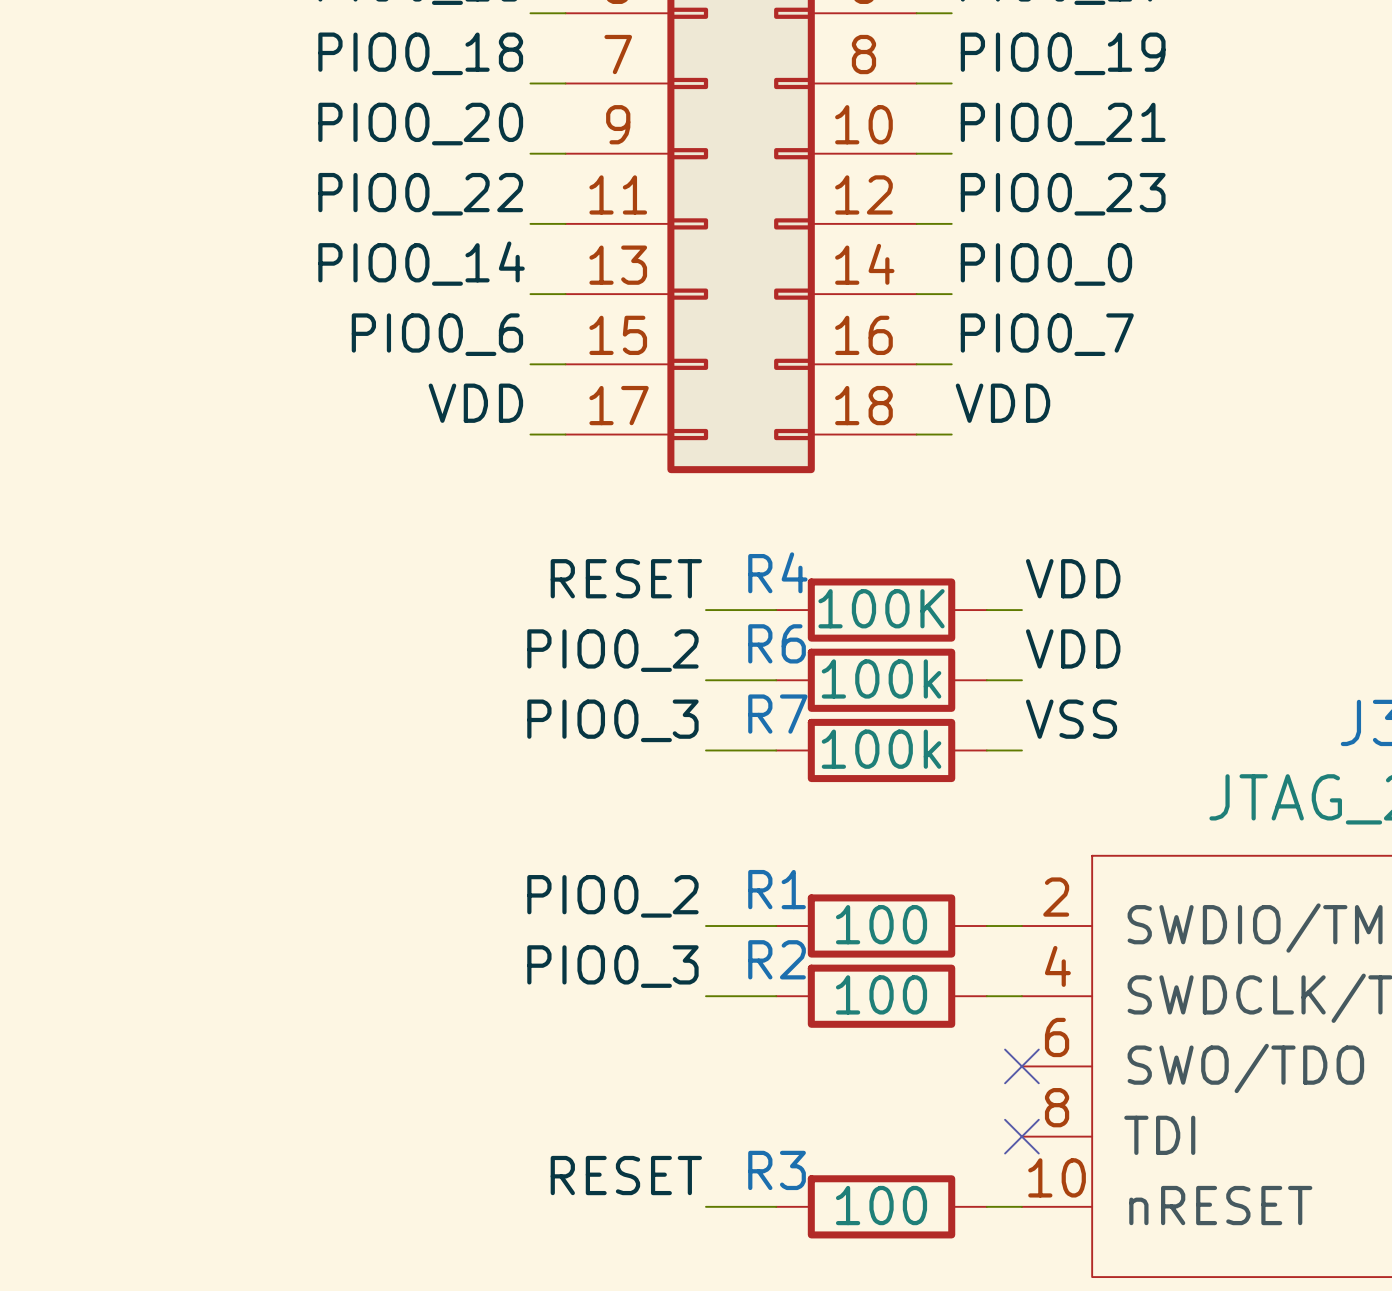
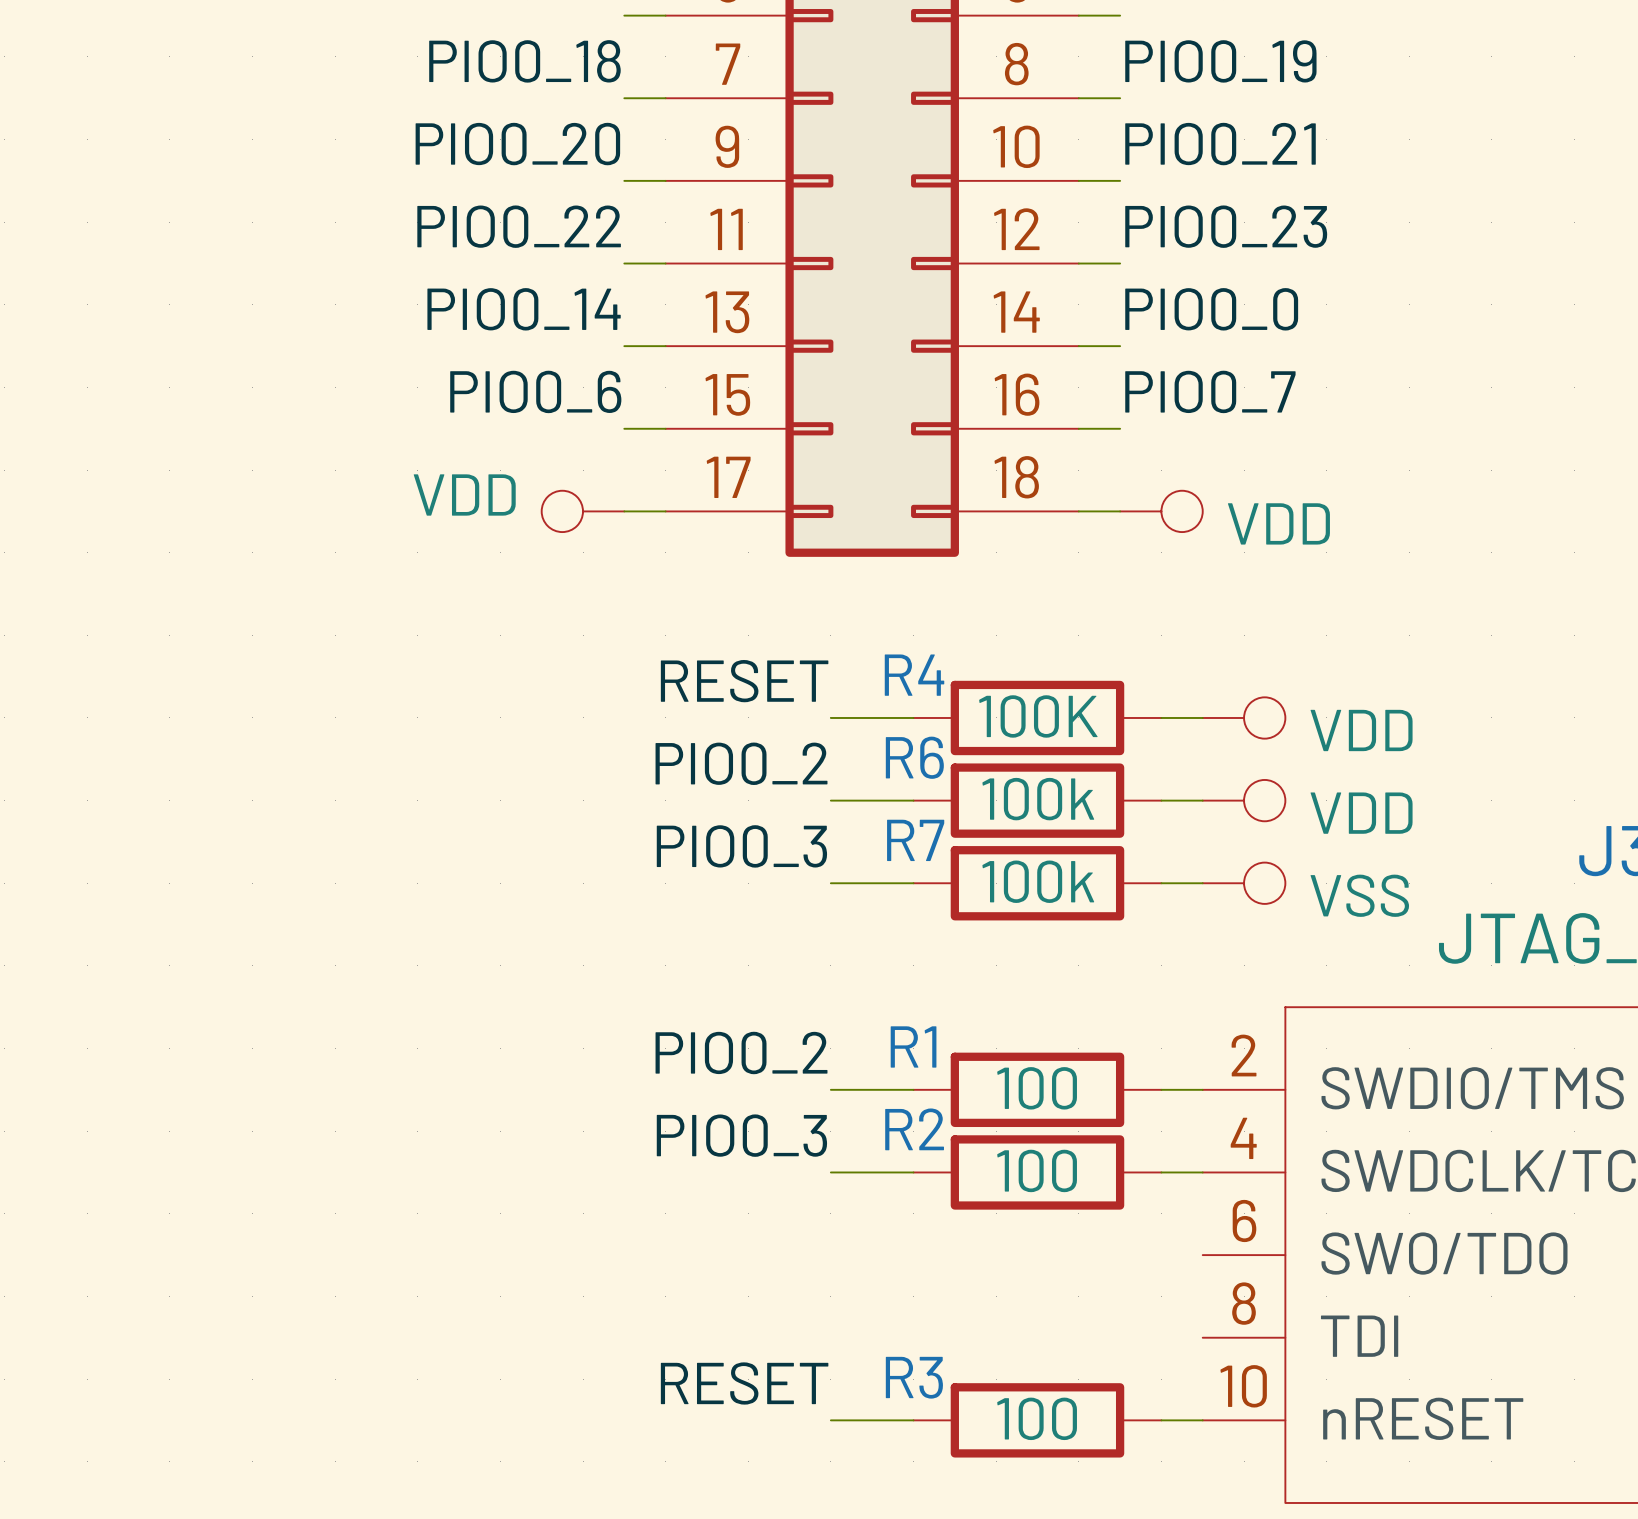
label: VDD (475, 403) -> none
label: VDD (1002, 403) -> none
power symbol: none -> VDD (583, 511)
power symbol: none -> VDD (1161, 511)
label: VDD (1073, 578) -> none
power symbol: none -> VDD (1244, 717)
label: VDD (1073, 648) -> none
power symbol: none -> VDD (1244, 800)
label: VSS (1071, 719) -> none
power symbol: none -> VSS (1244, 883)
no-connect mark: (1021, 1066) -> none
no-connect mark: (1021, 1136) -> none

